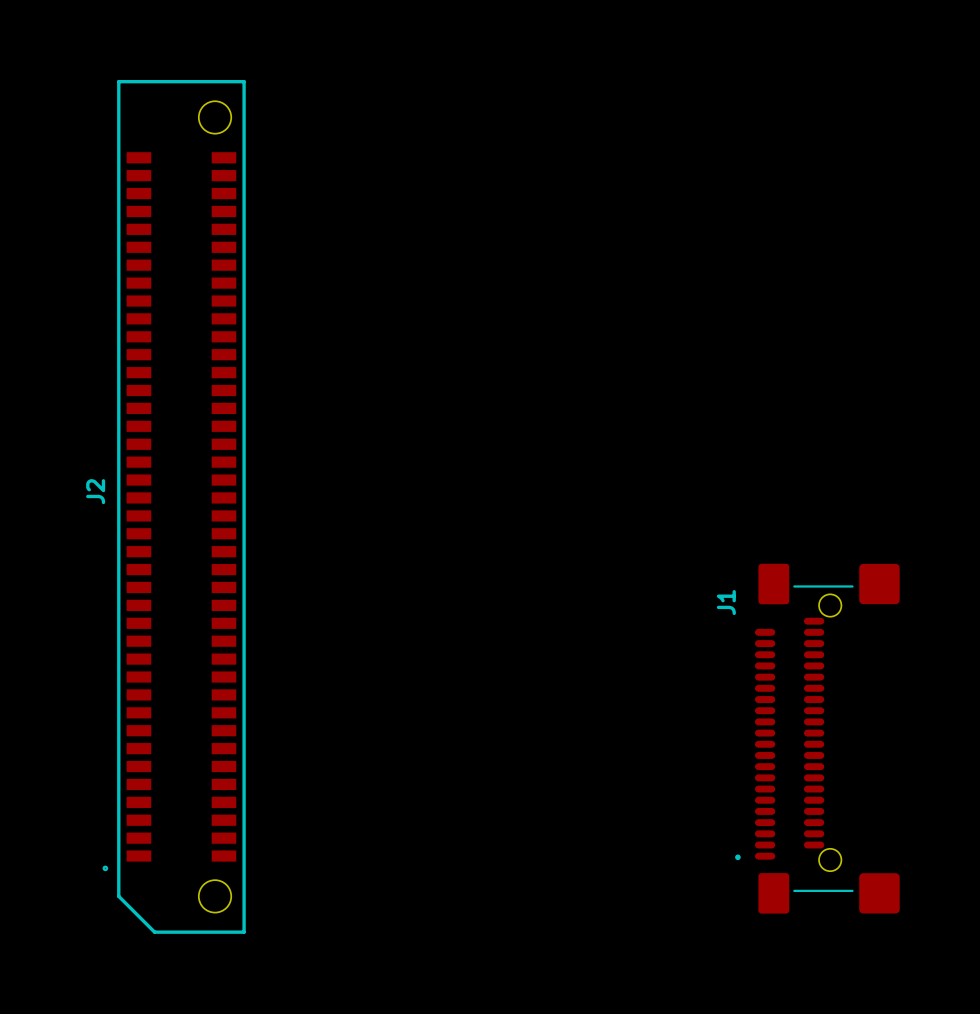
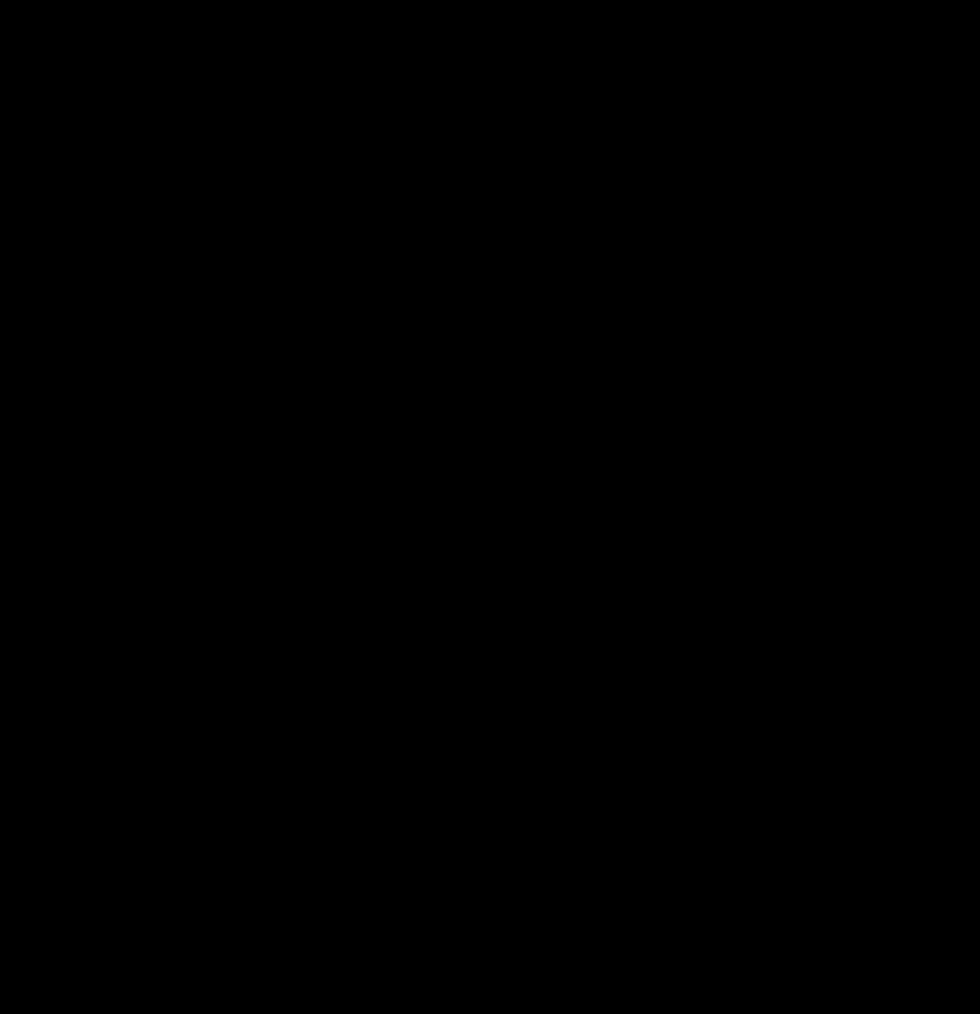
J2: (174, 506) -> none
J1: (817, 738) -> none

